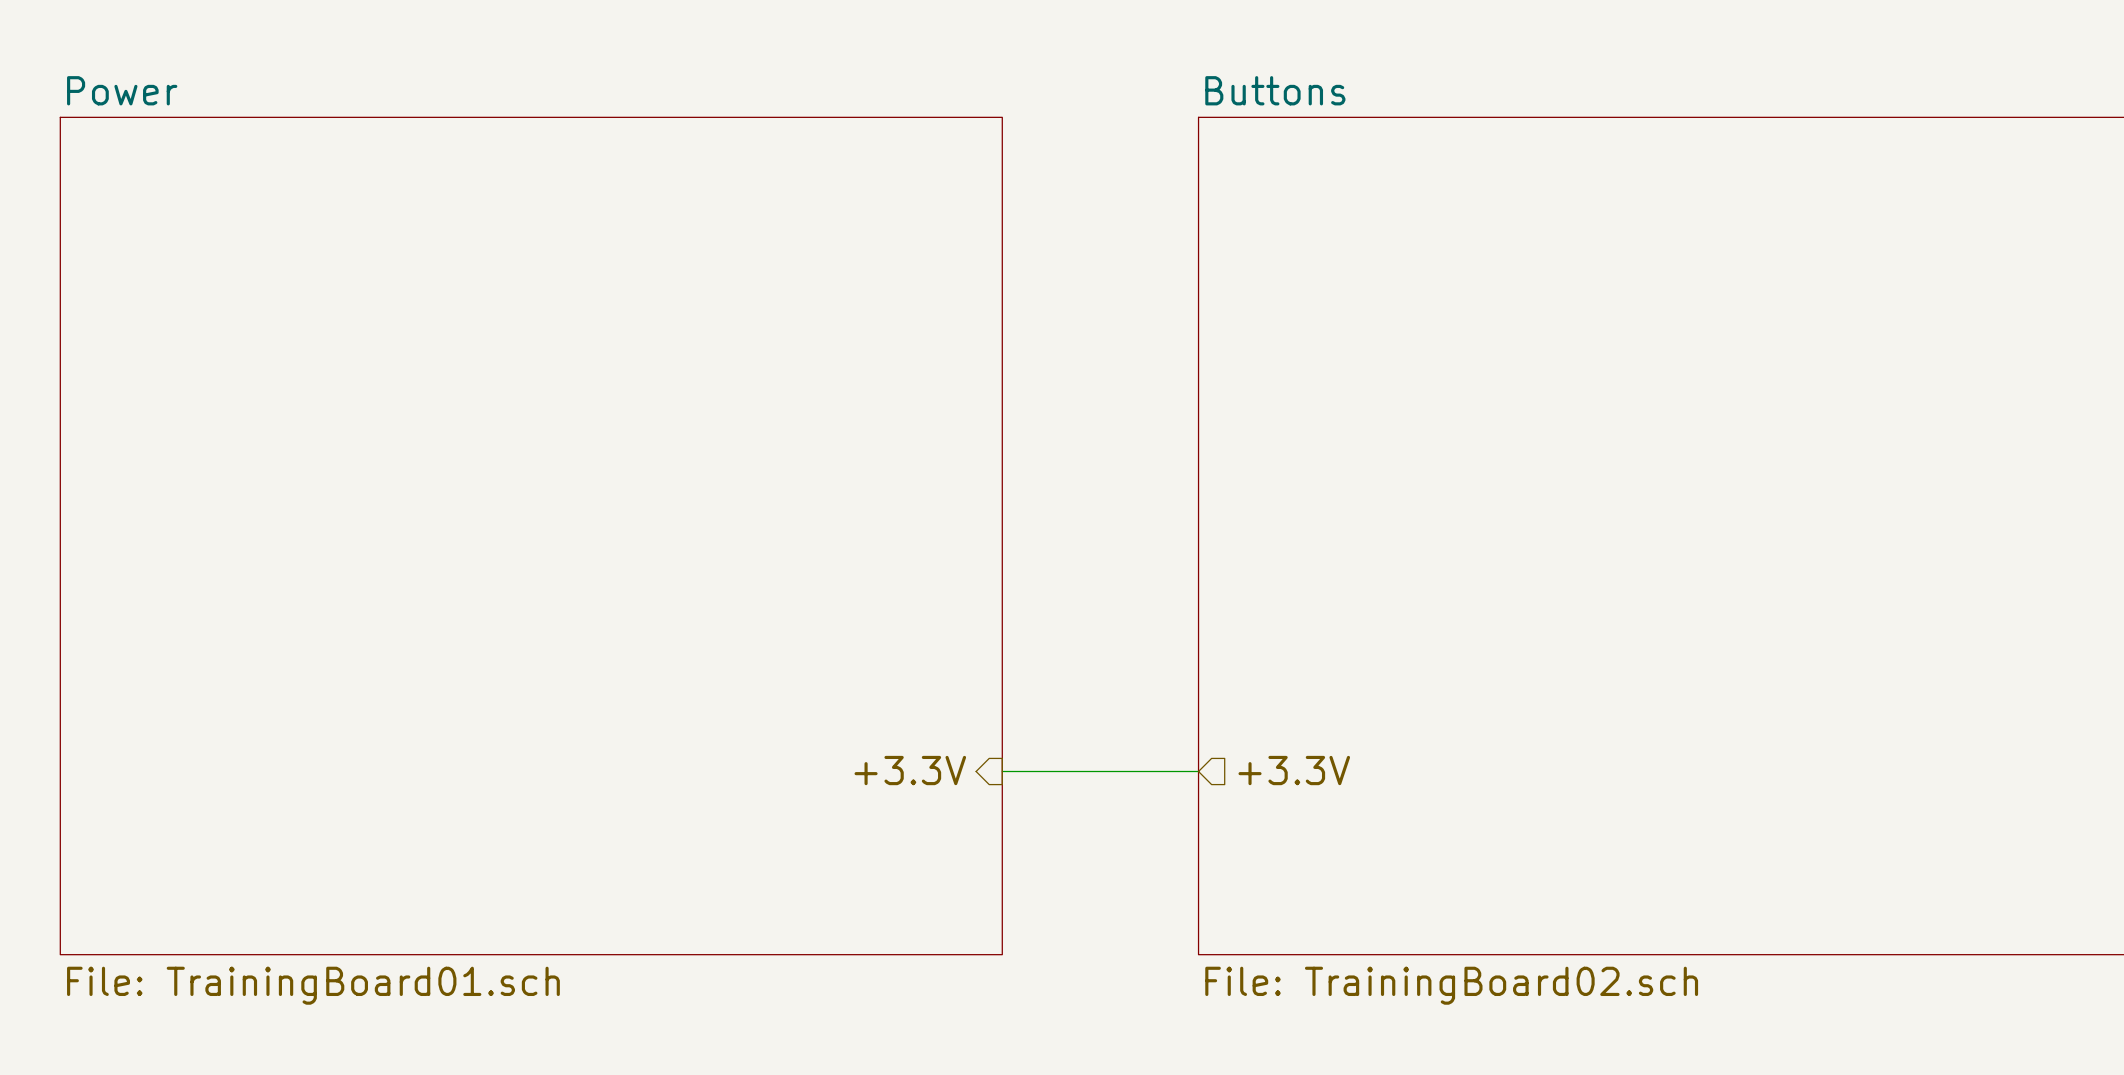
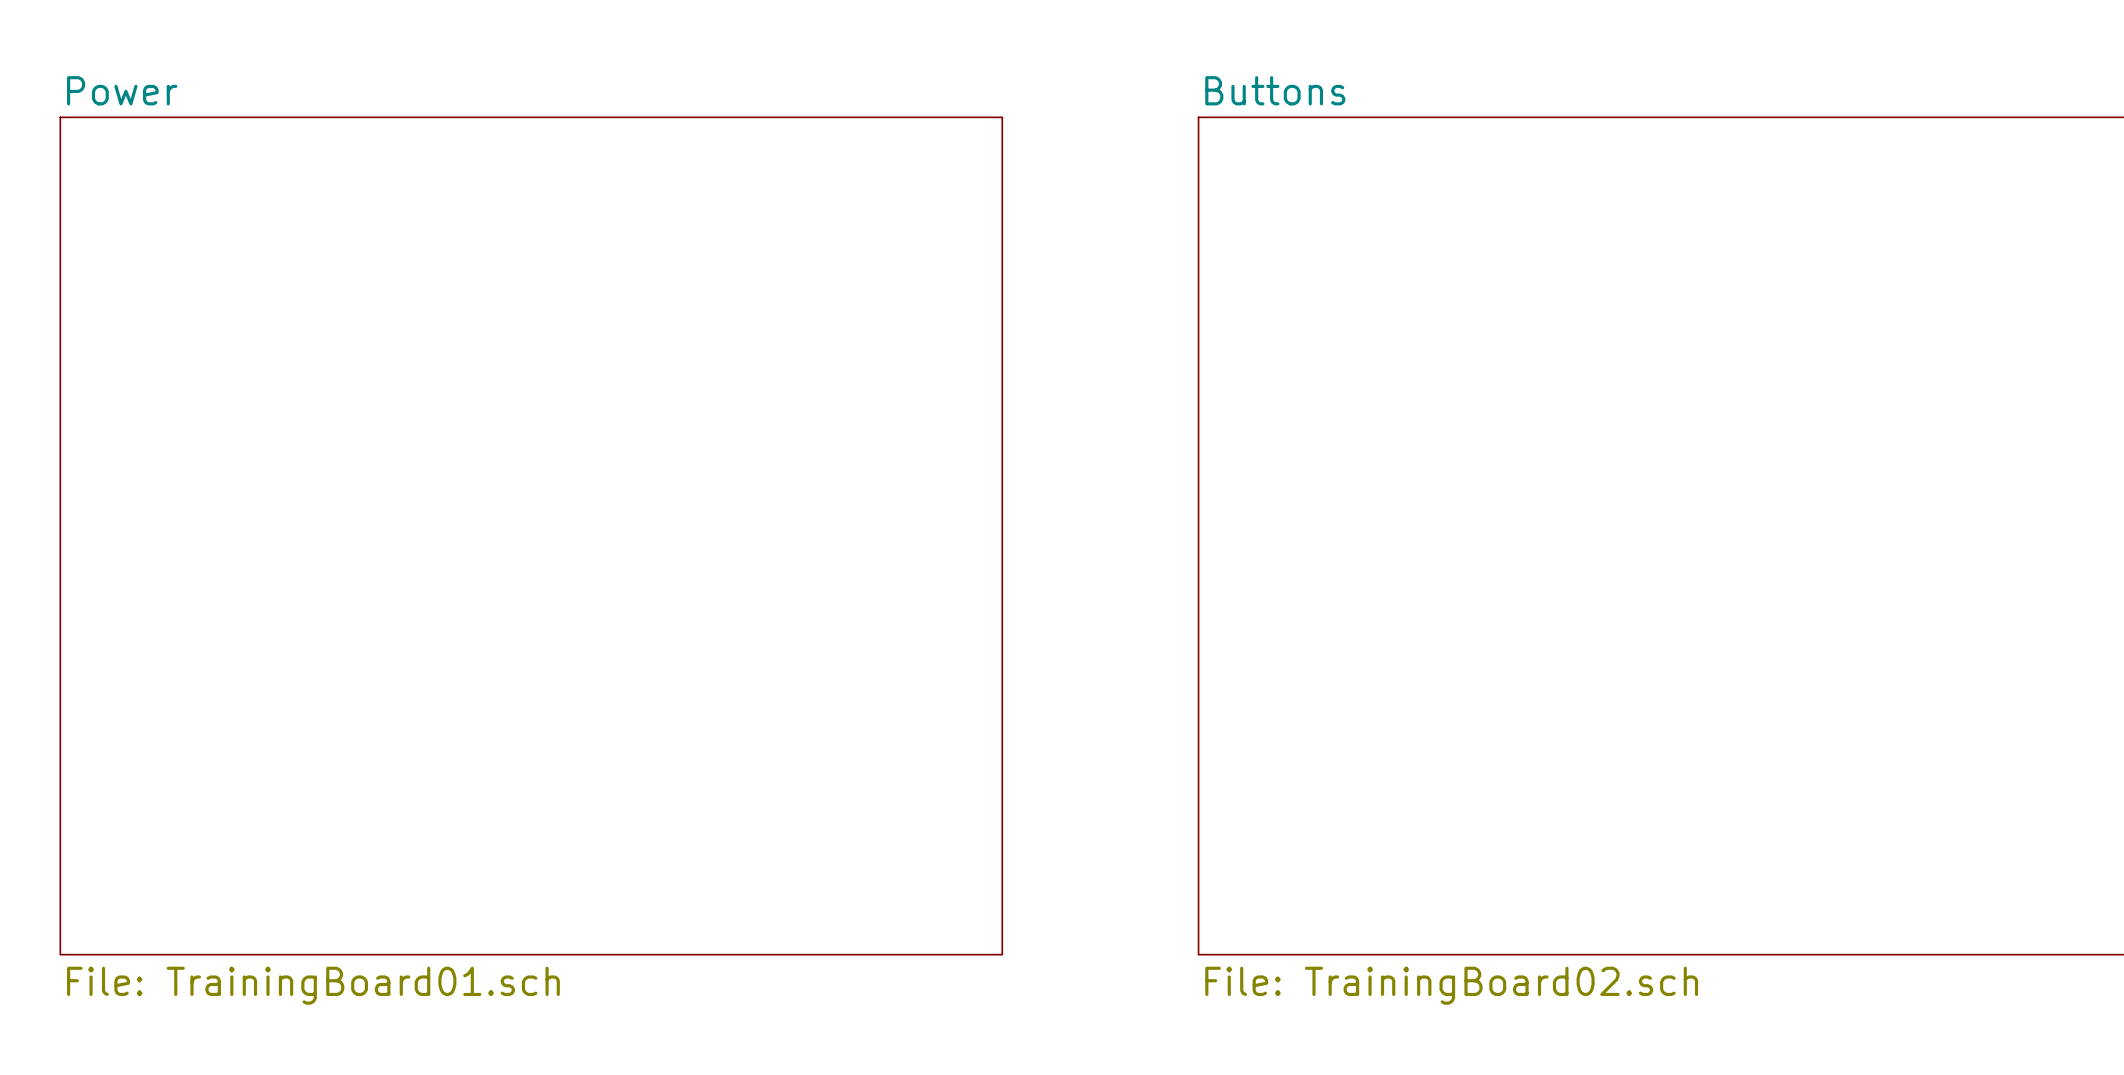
hierarchical label: +3.3V (910, 770) -> none
hierarchical label: +3.3V (1294, 770) -> none
wire: (1002, 771) (1198, 771) -> none

